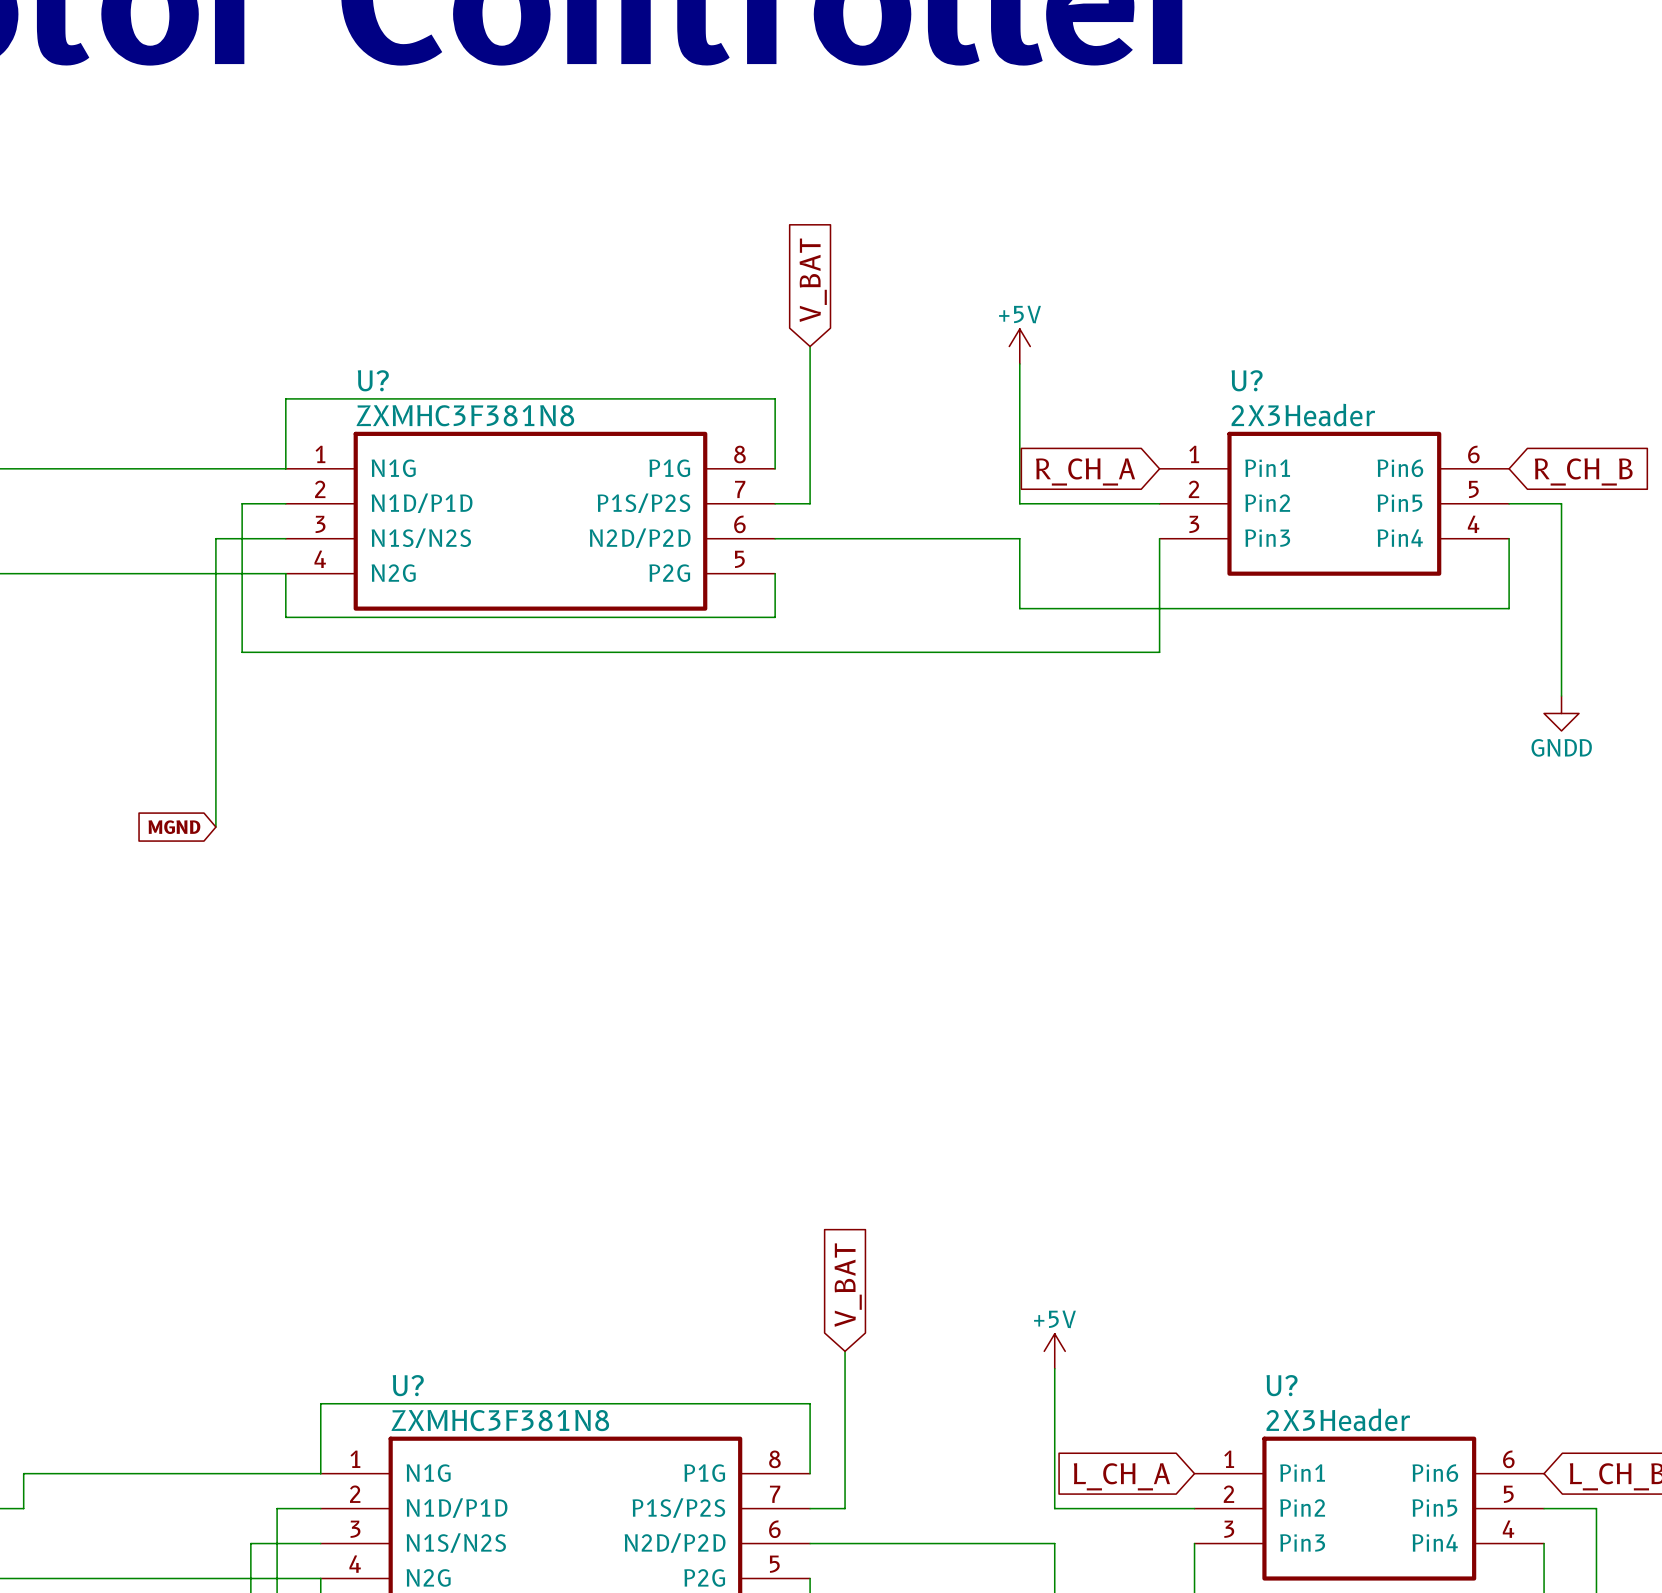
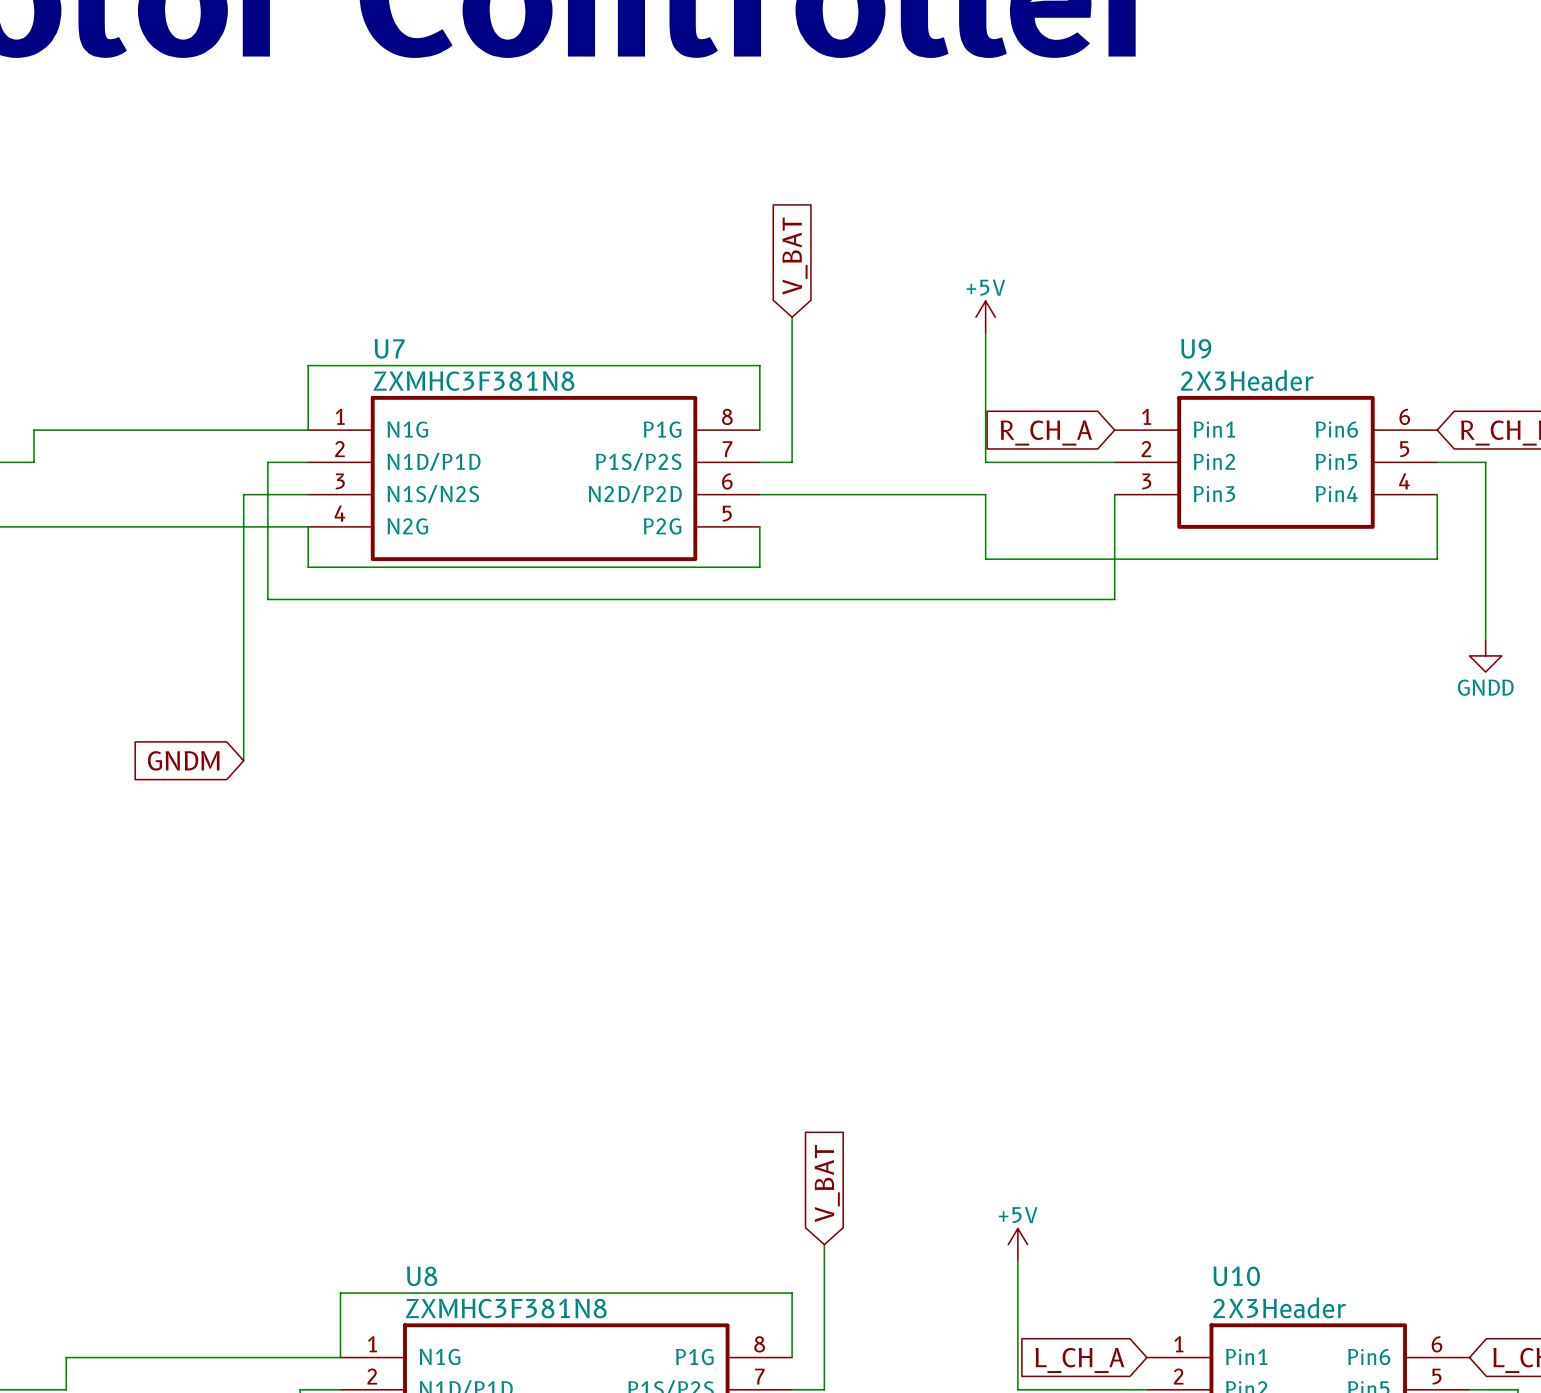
U? name: U? (373, 380) -> U7 (389, 348)
U? name: U? (1247, 380) -> U9 (1196, 348)
global label: MGND (174, 827) -> GNDM (183, 760)
U? name: U? (408, 1385) -> U8 (422, 1276)
U? name: U? (1282, 1385) -> U10 (1236, 1276)

